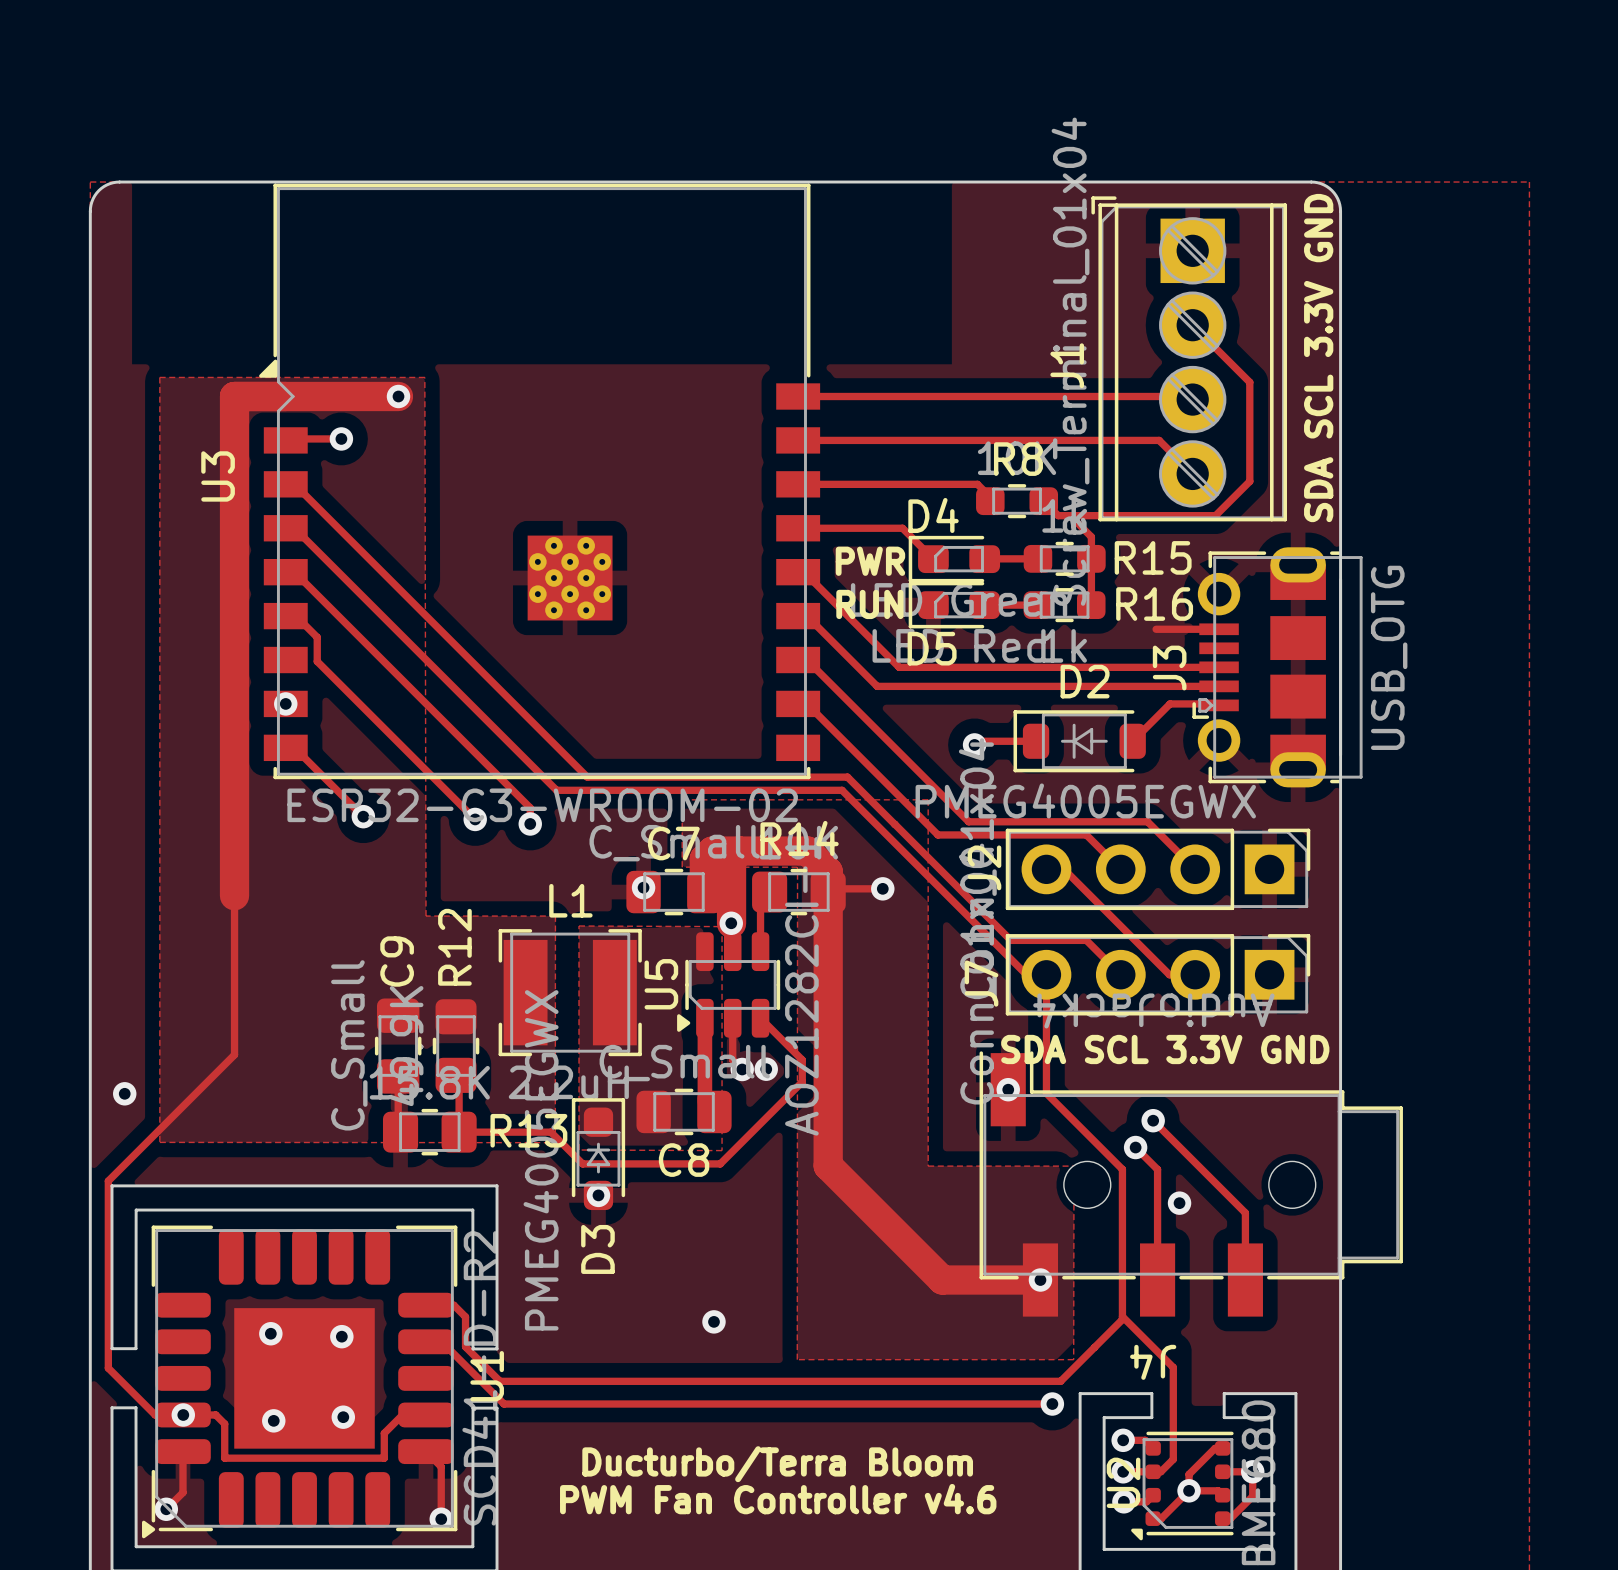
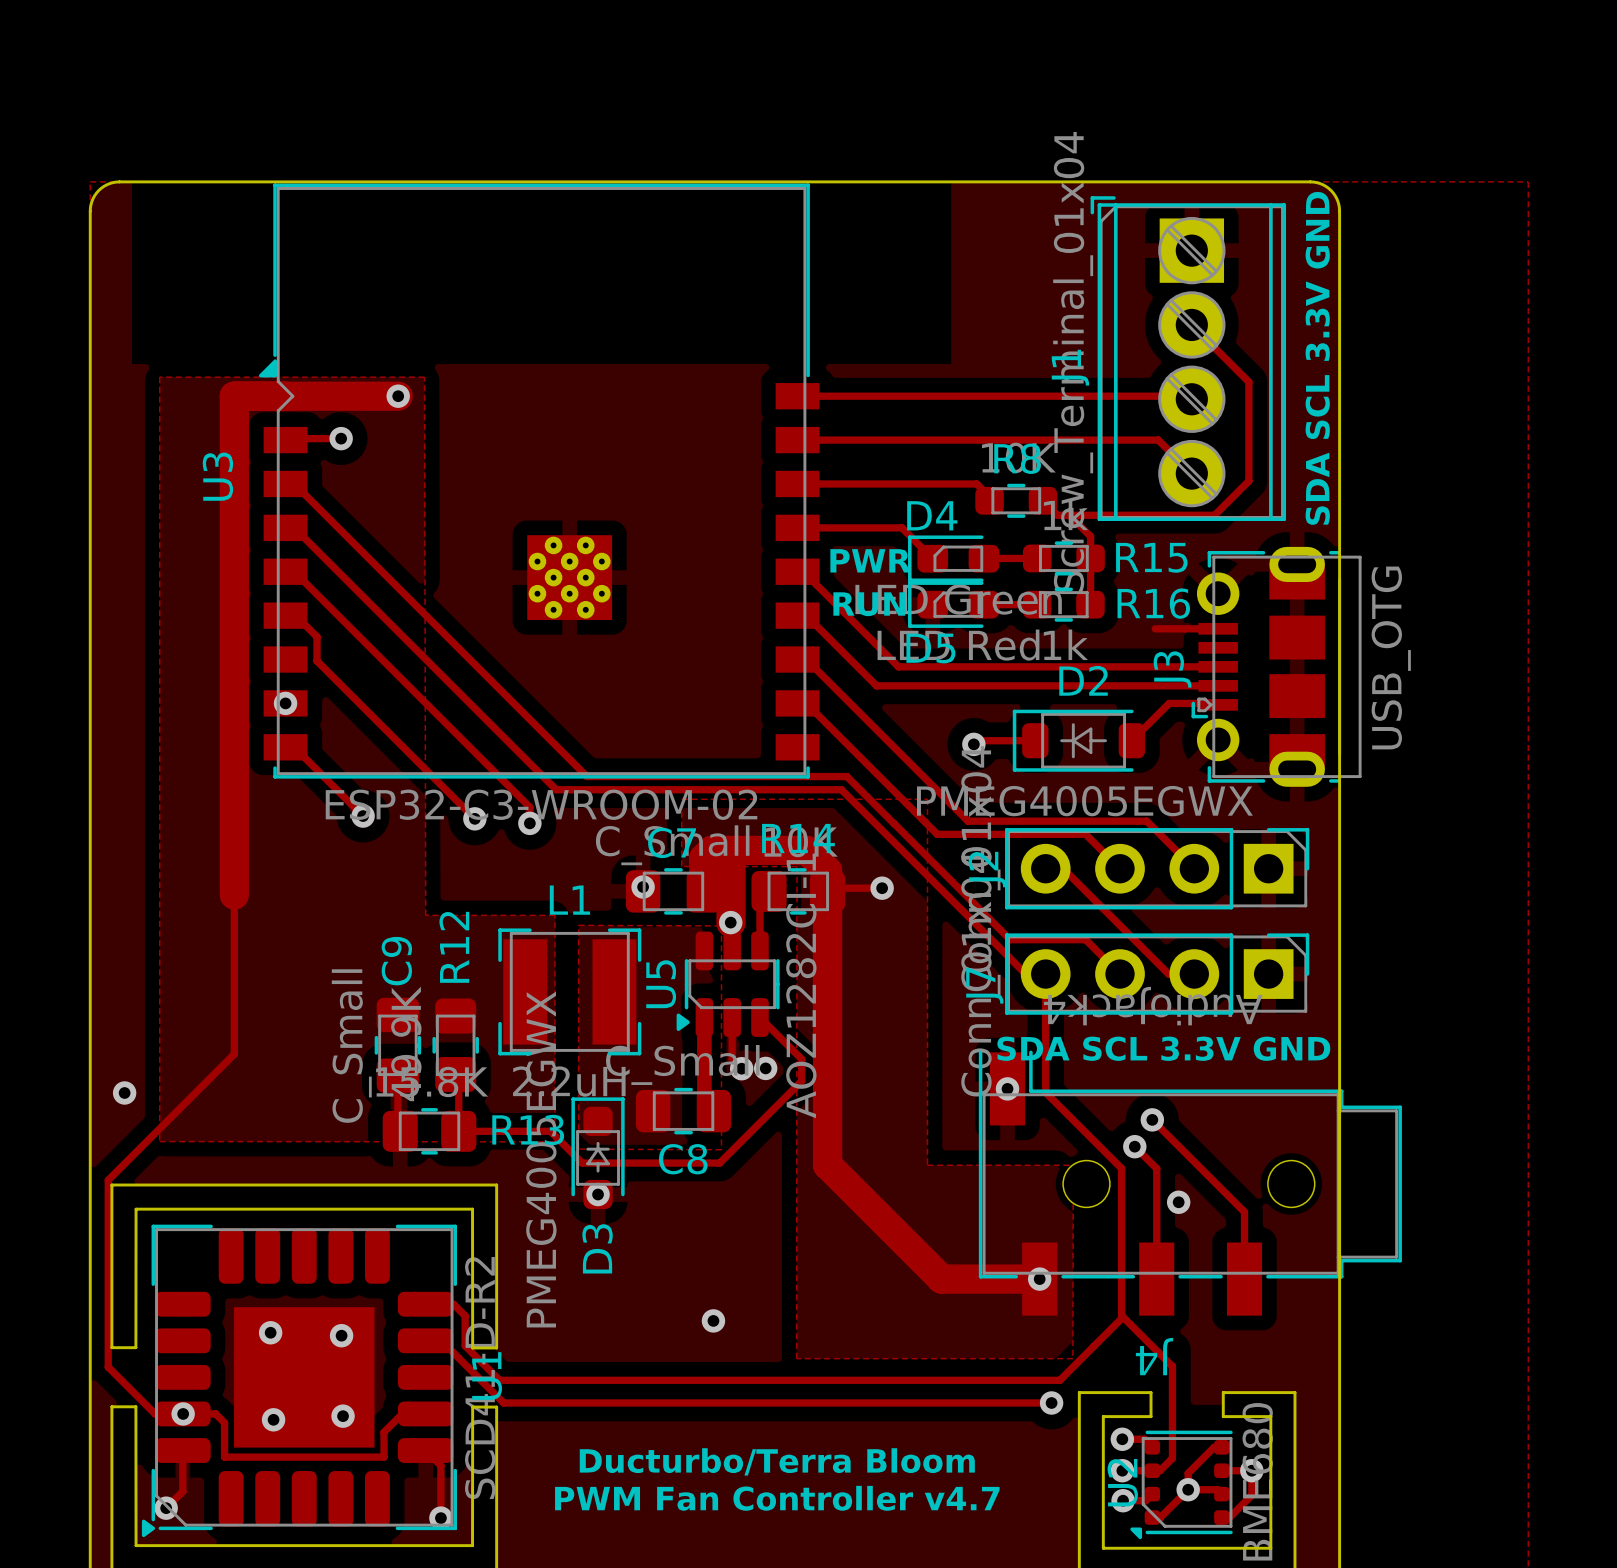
text: PWM Fan Controller v4.6 (778, 1499) -> PWM Fan Controller v4.7 (777, 1498)

